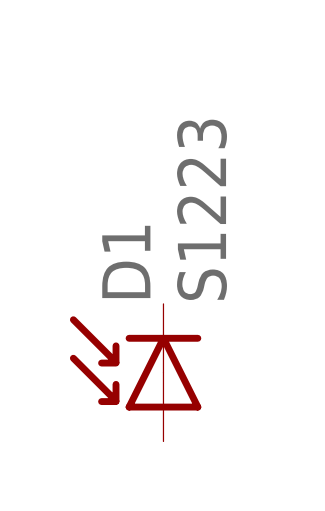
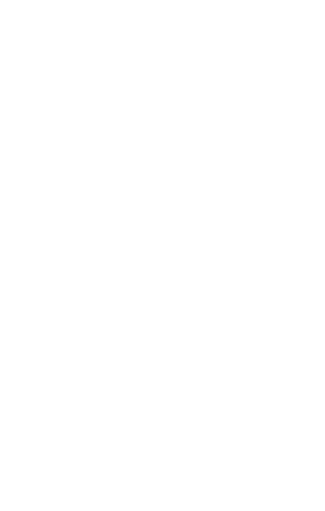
D1: S1223 (135, 372) -> none

